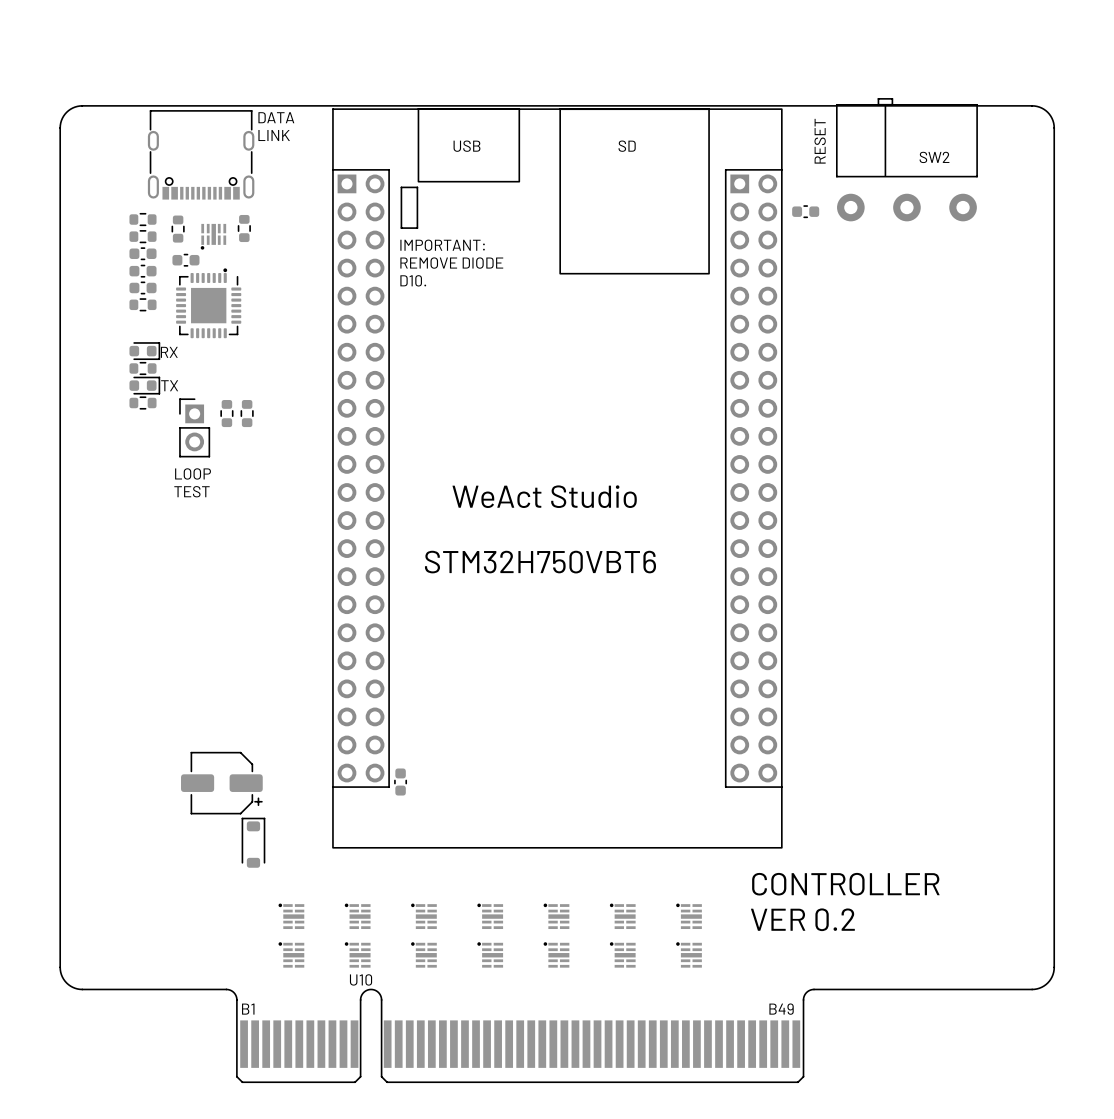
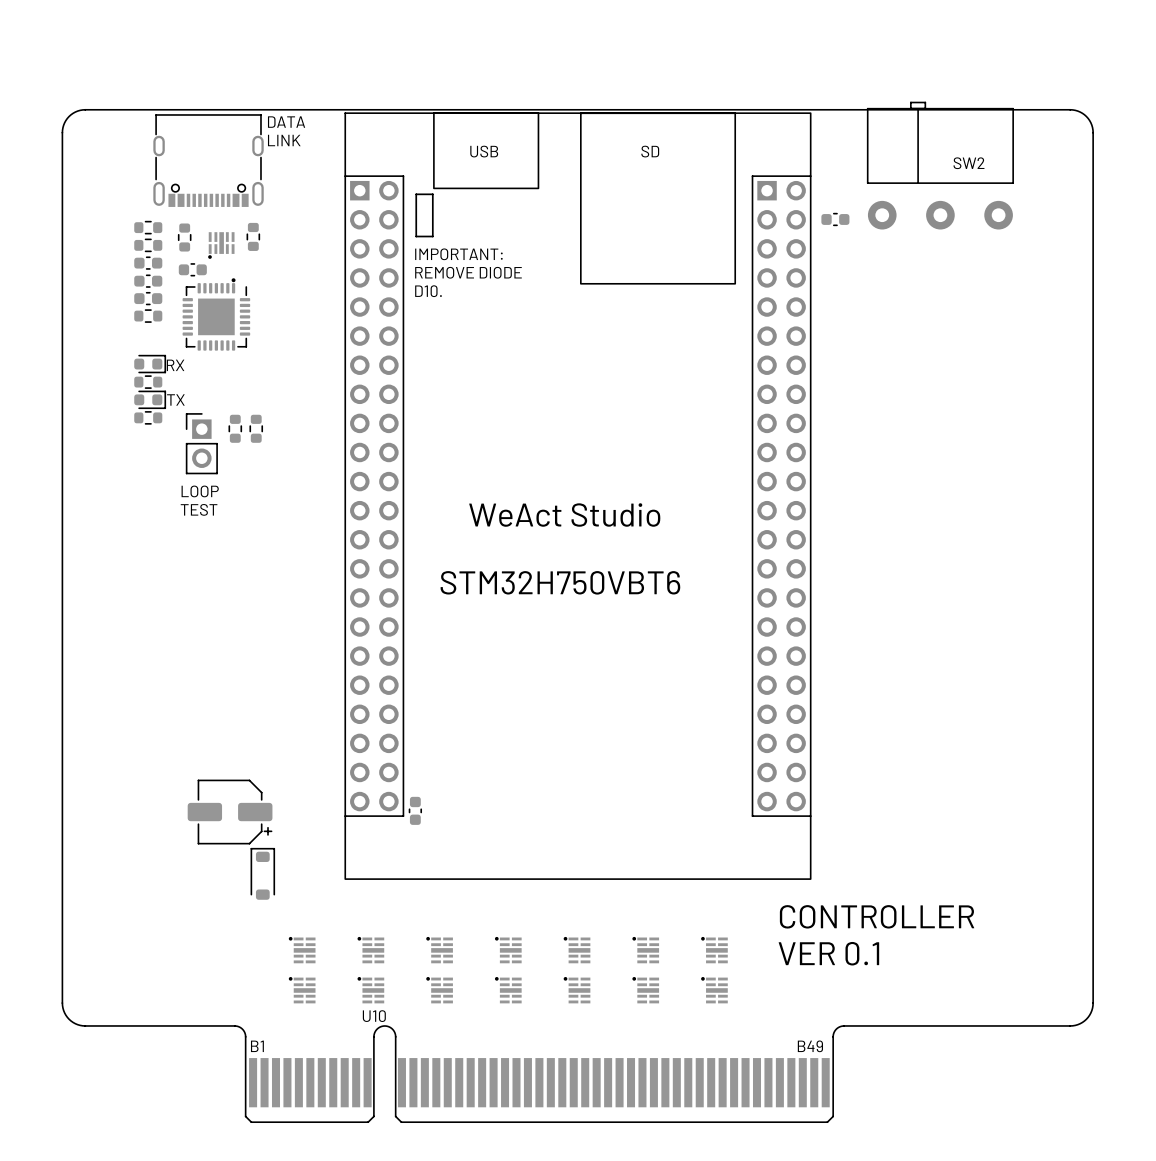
text: RESET (820, 141) -> none
text: VER 0.2 (802, 919) -> VER 0.1 (828, 953)

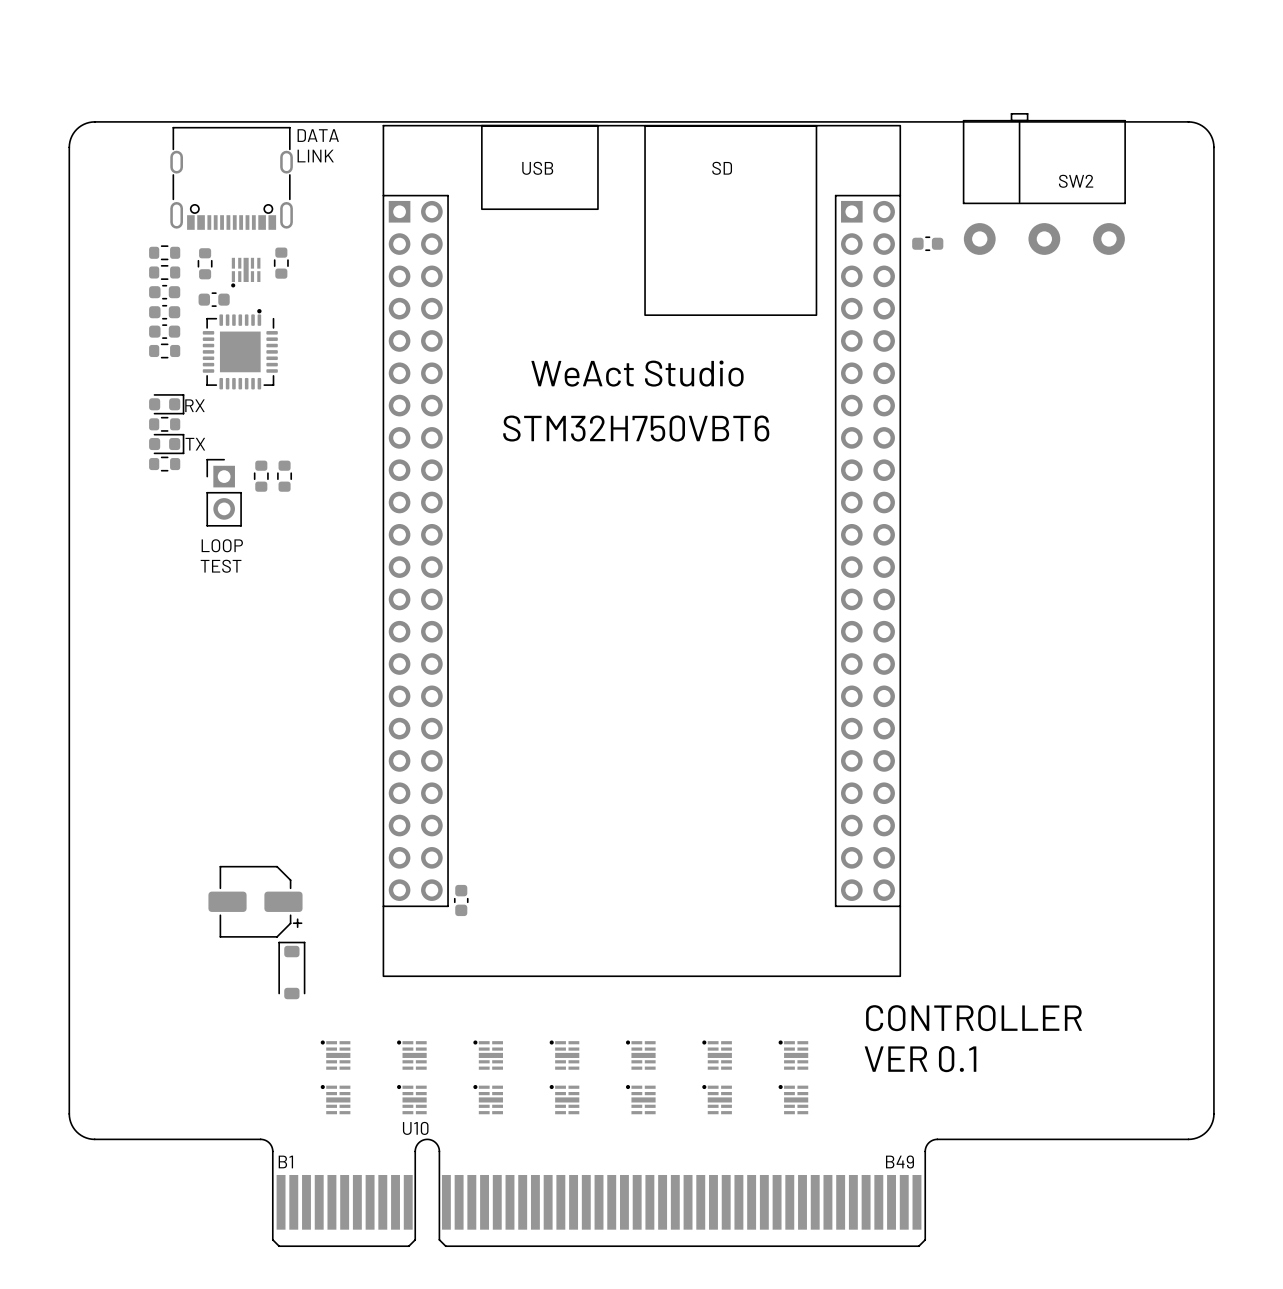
line: (416, 194) (432, 194) (432, 236) (416, 236) (416, 194) -> none
text: IMPORTANT: (458, 254) -> none
text: REMOVE DIODE (468, 272) -> none
text: D10. (428, 291) -> none
text position: WeAct Studio (564, 515) -> WeAct Studio (637, 373)
text position: STM32H750VBT6 (560, 582) -> STM32H750VBT6 (636, 428)

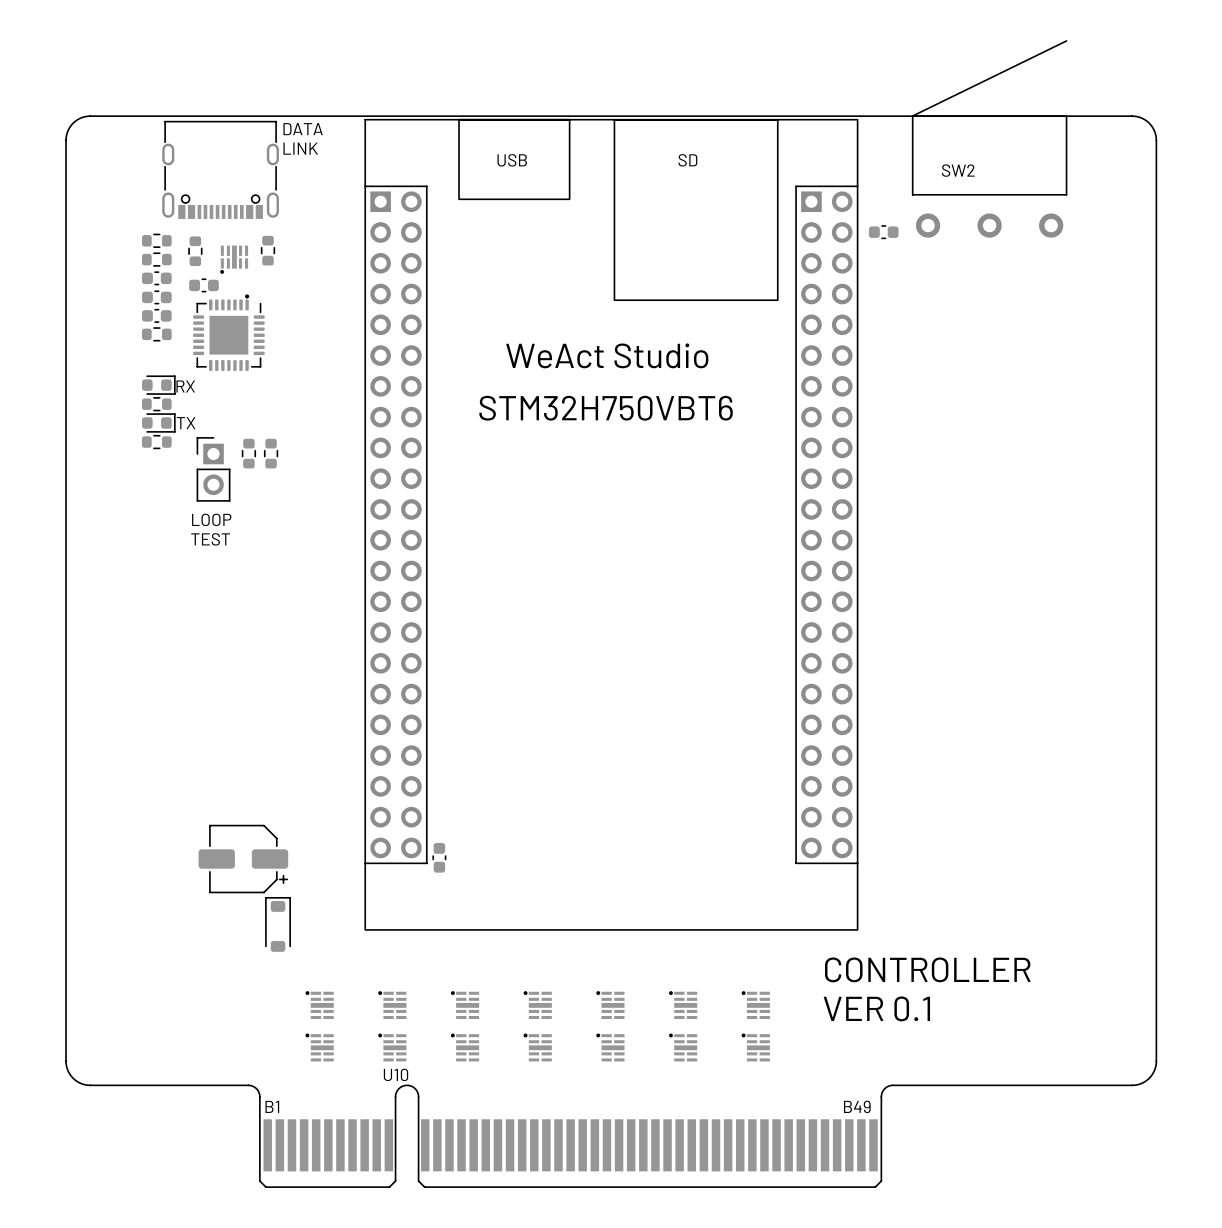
SW2 footprint: [962, 113, 1126, 255] -> [911, 40, 1068, 238]
SW2 name position: SW2 (1076, 181) -> SW2 (958, 170)

